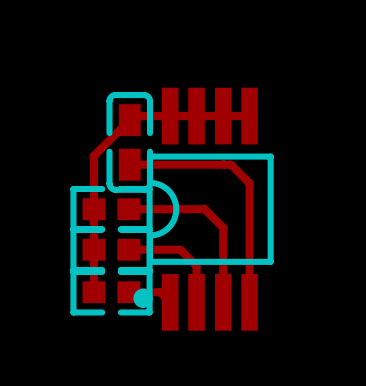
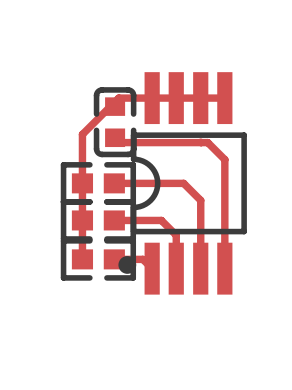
part footprint: [106, 91, 154, 193] -> [93, 87, 137, 158]

